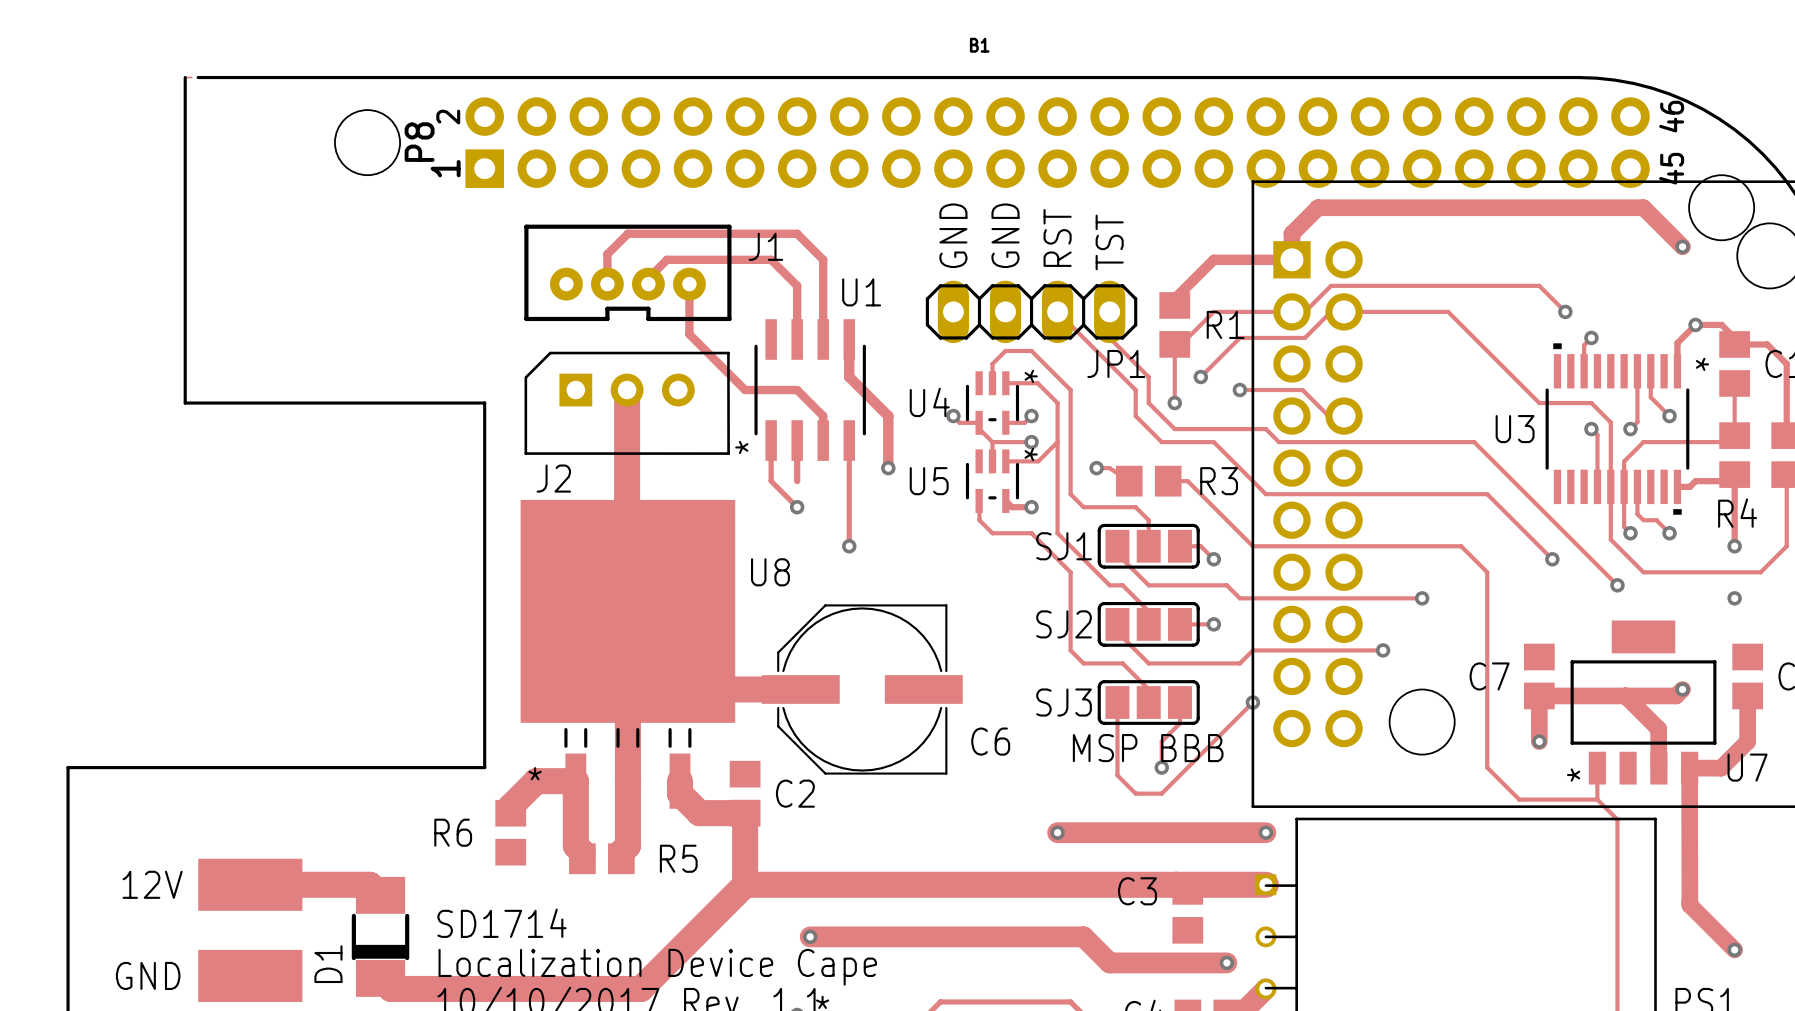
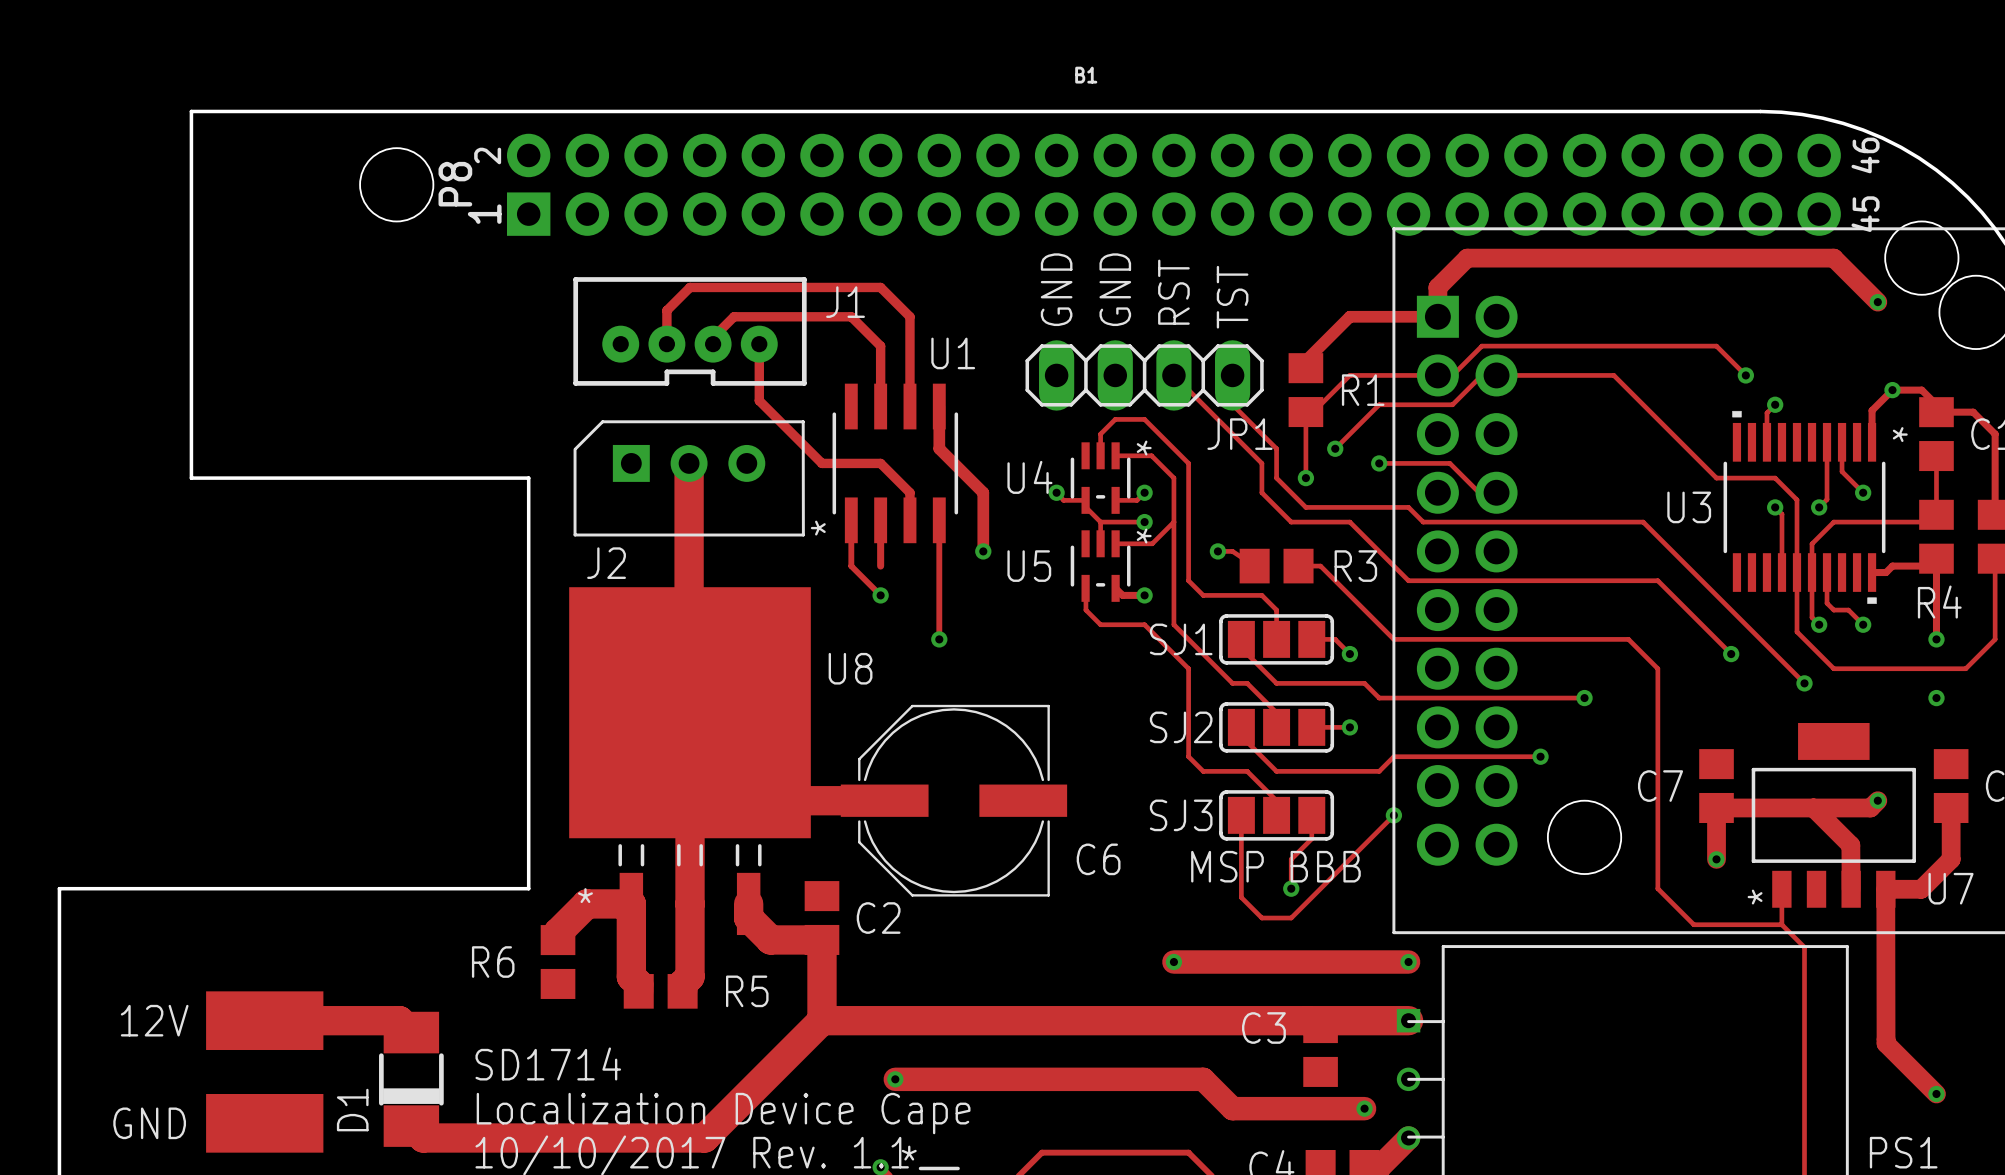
board edge: none -> (191, 111) (206, 111)

